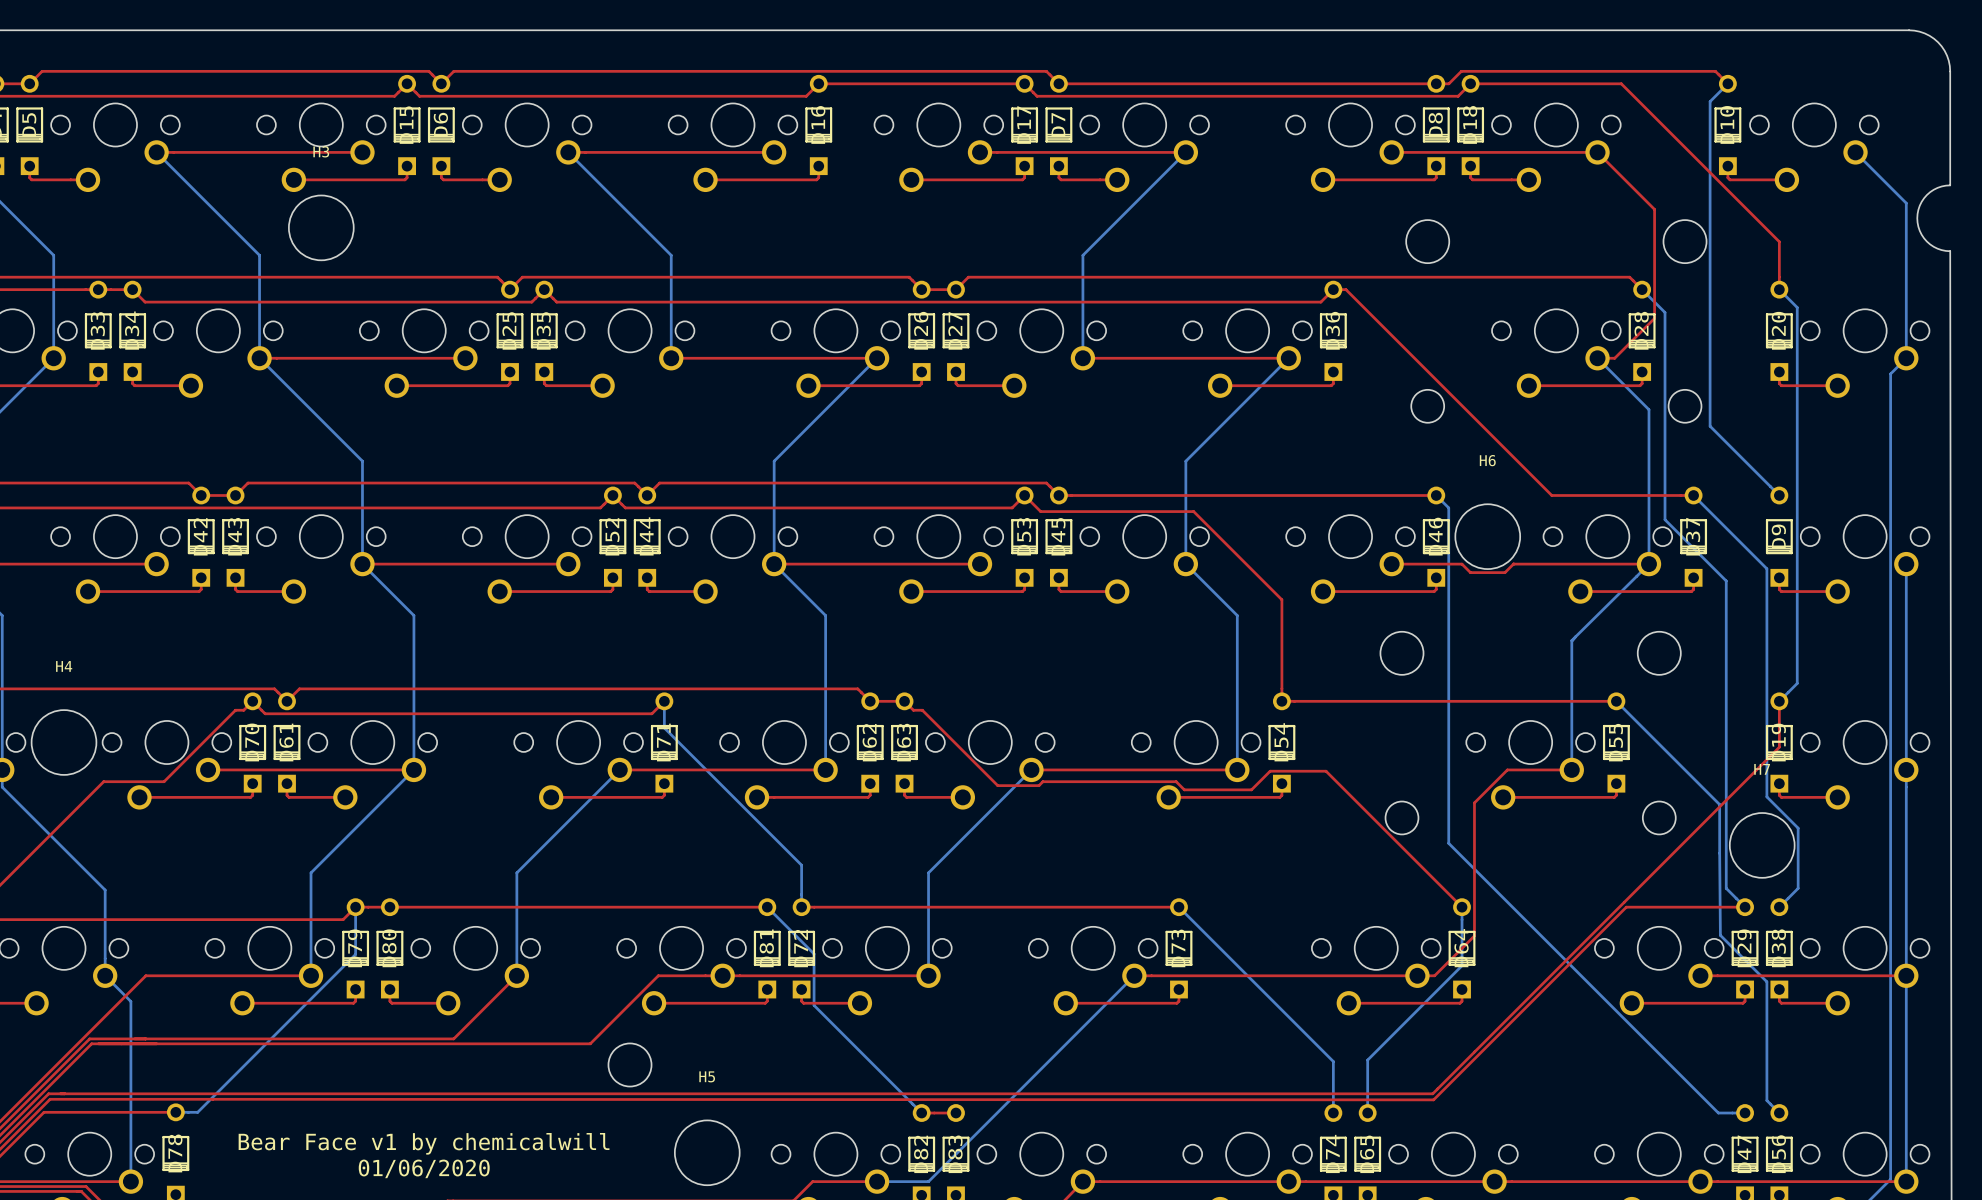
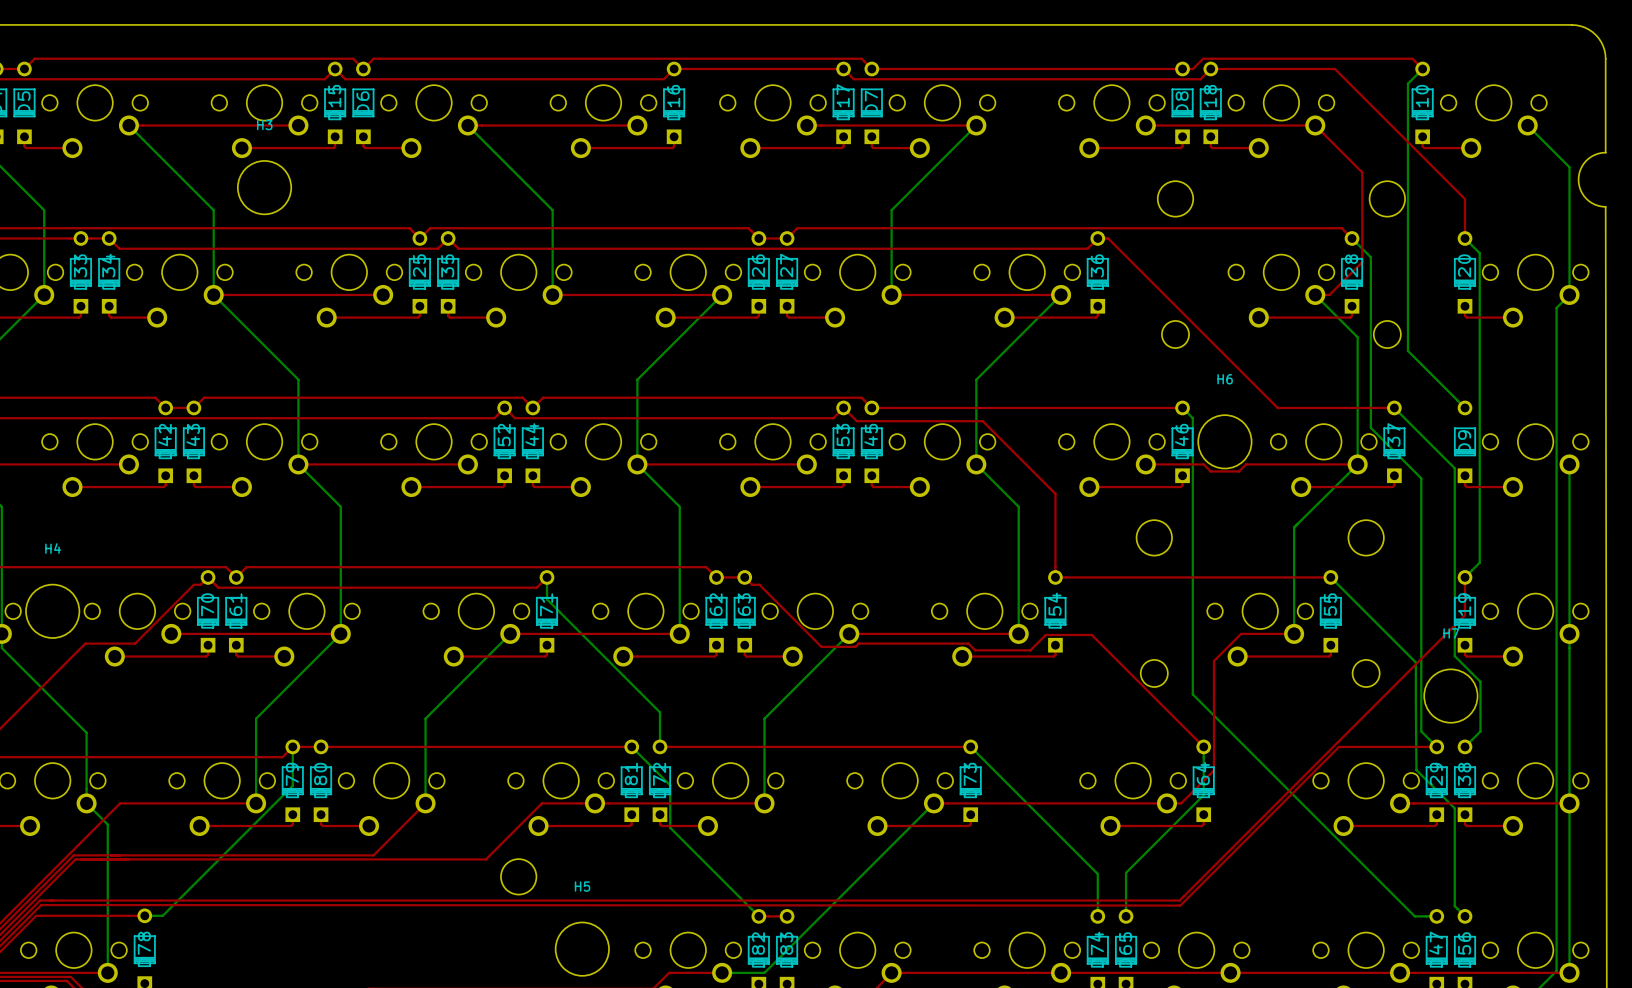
text: Bear Face v1 by chemicalwill (424, 1143) -> none
text: 01/06/2020 (424, 1168) -> none

